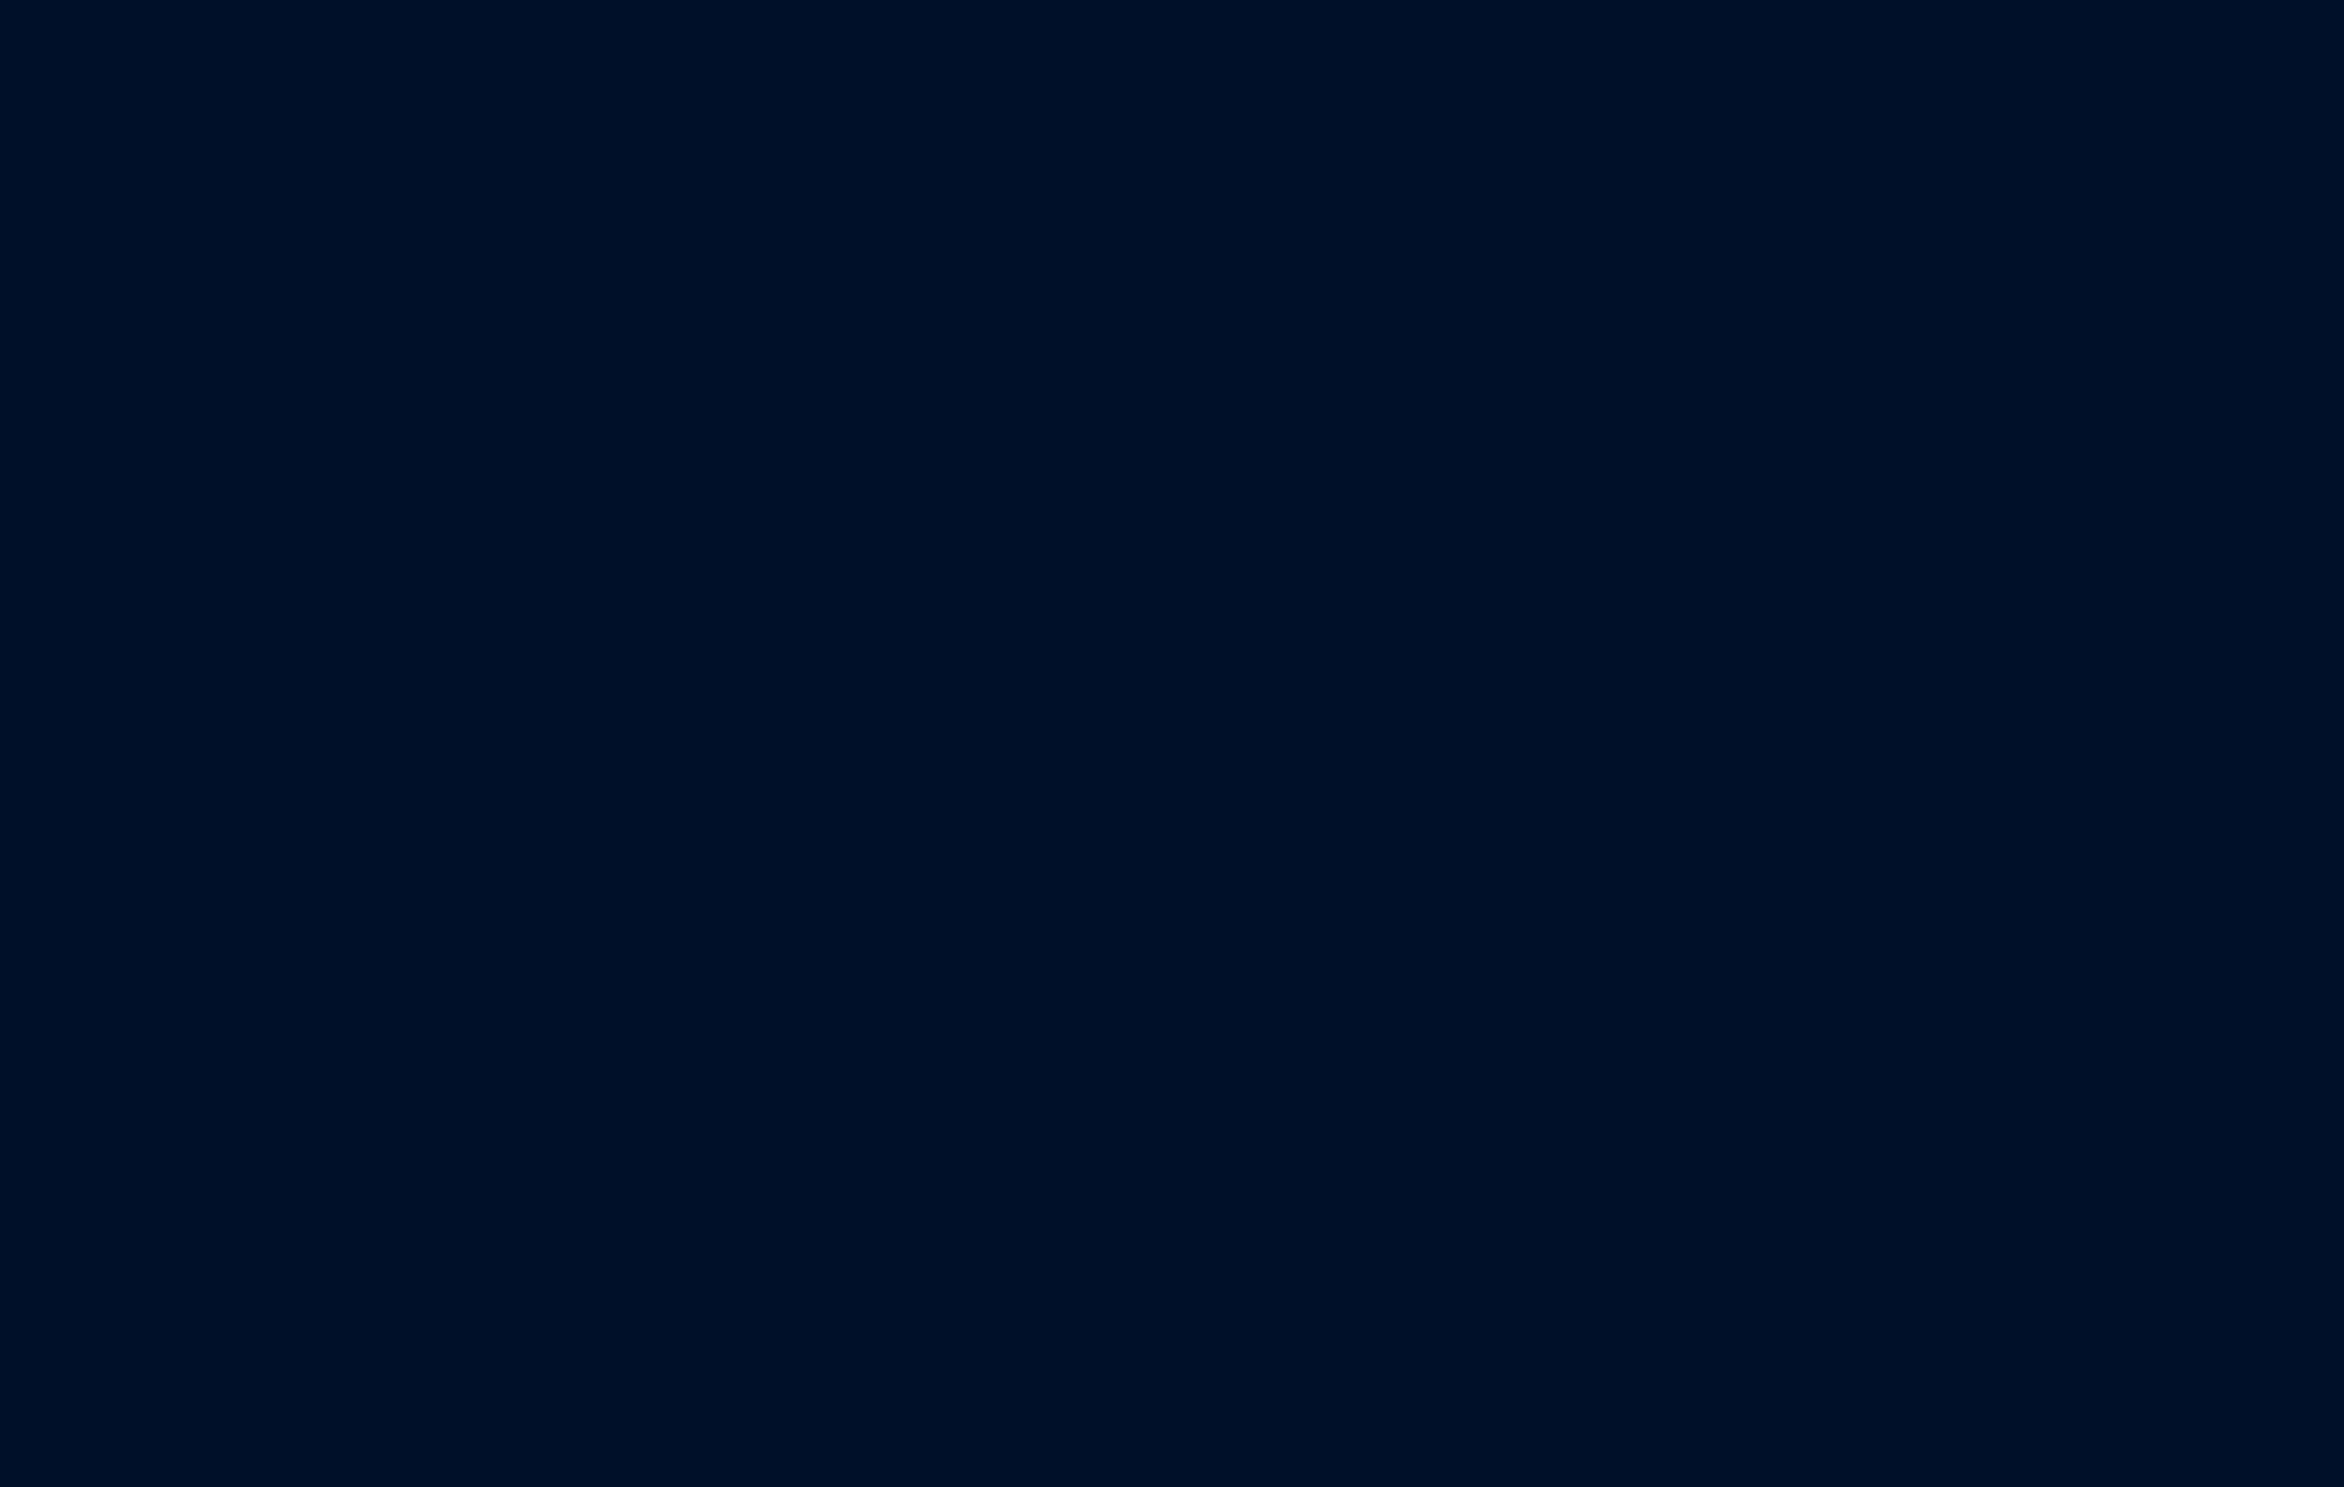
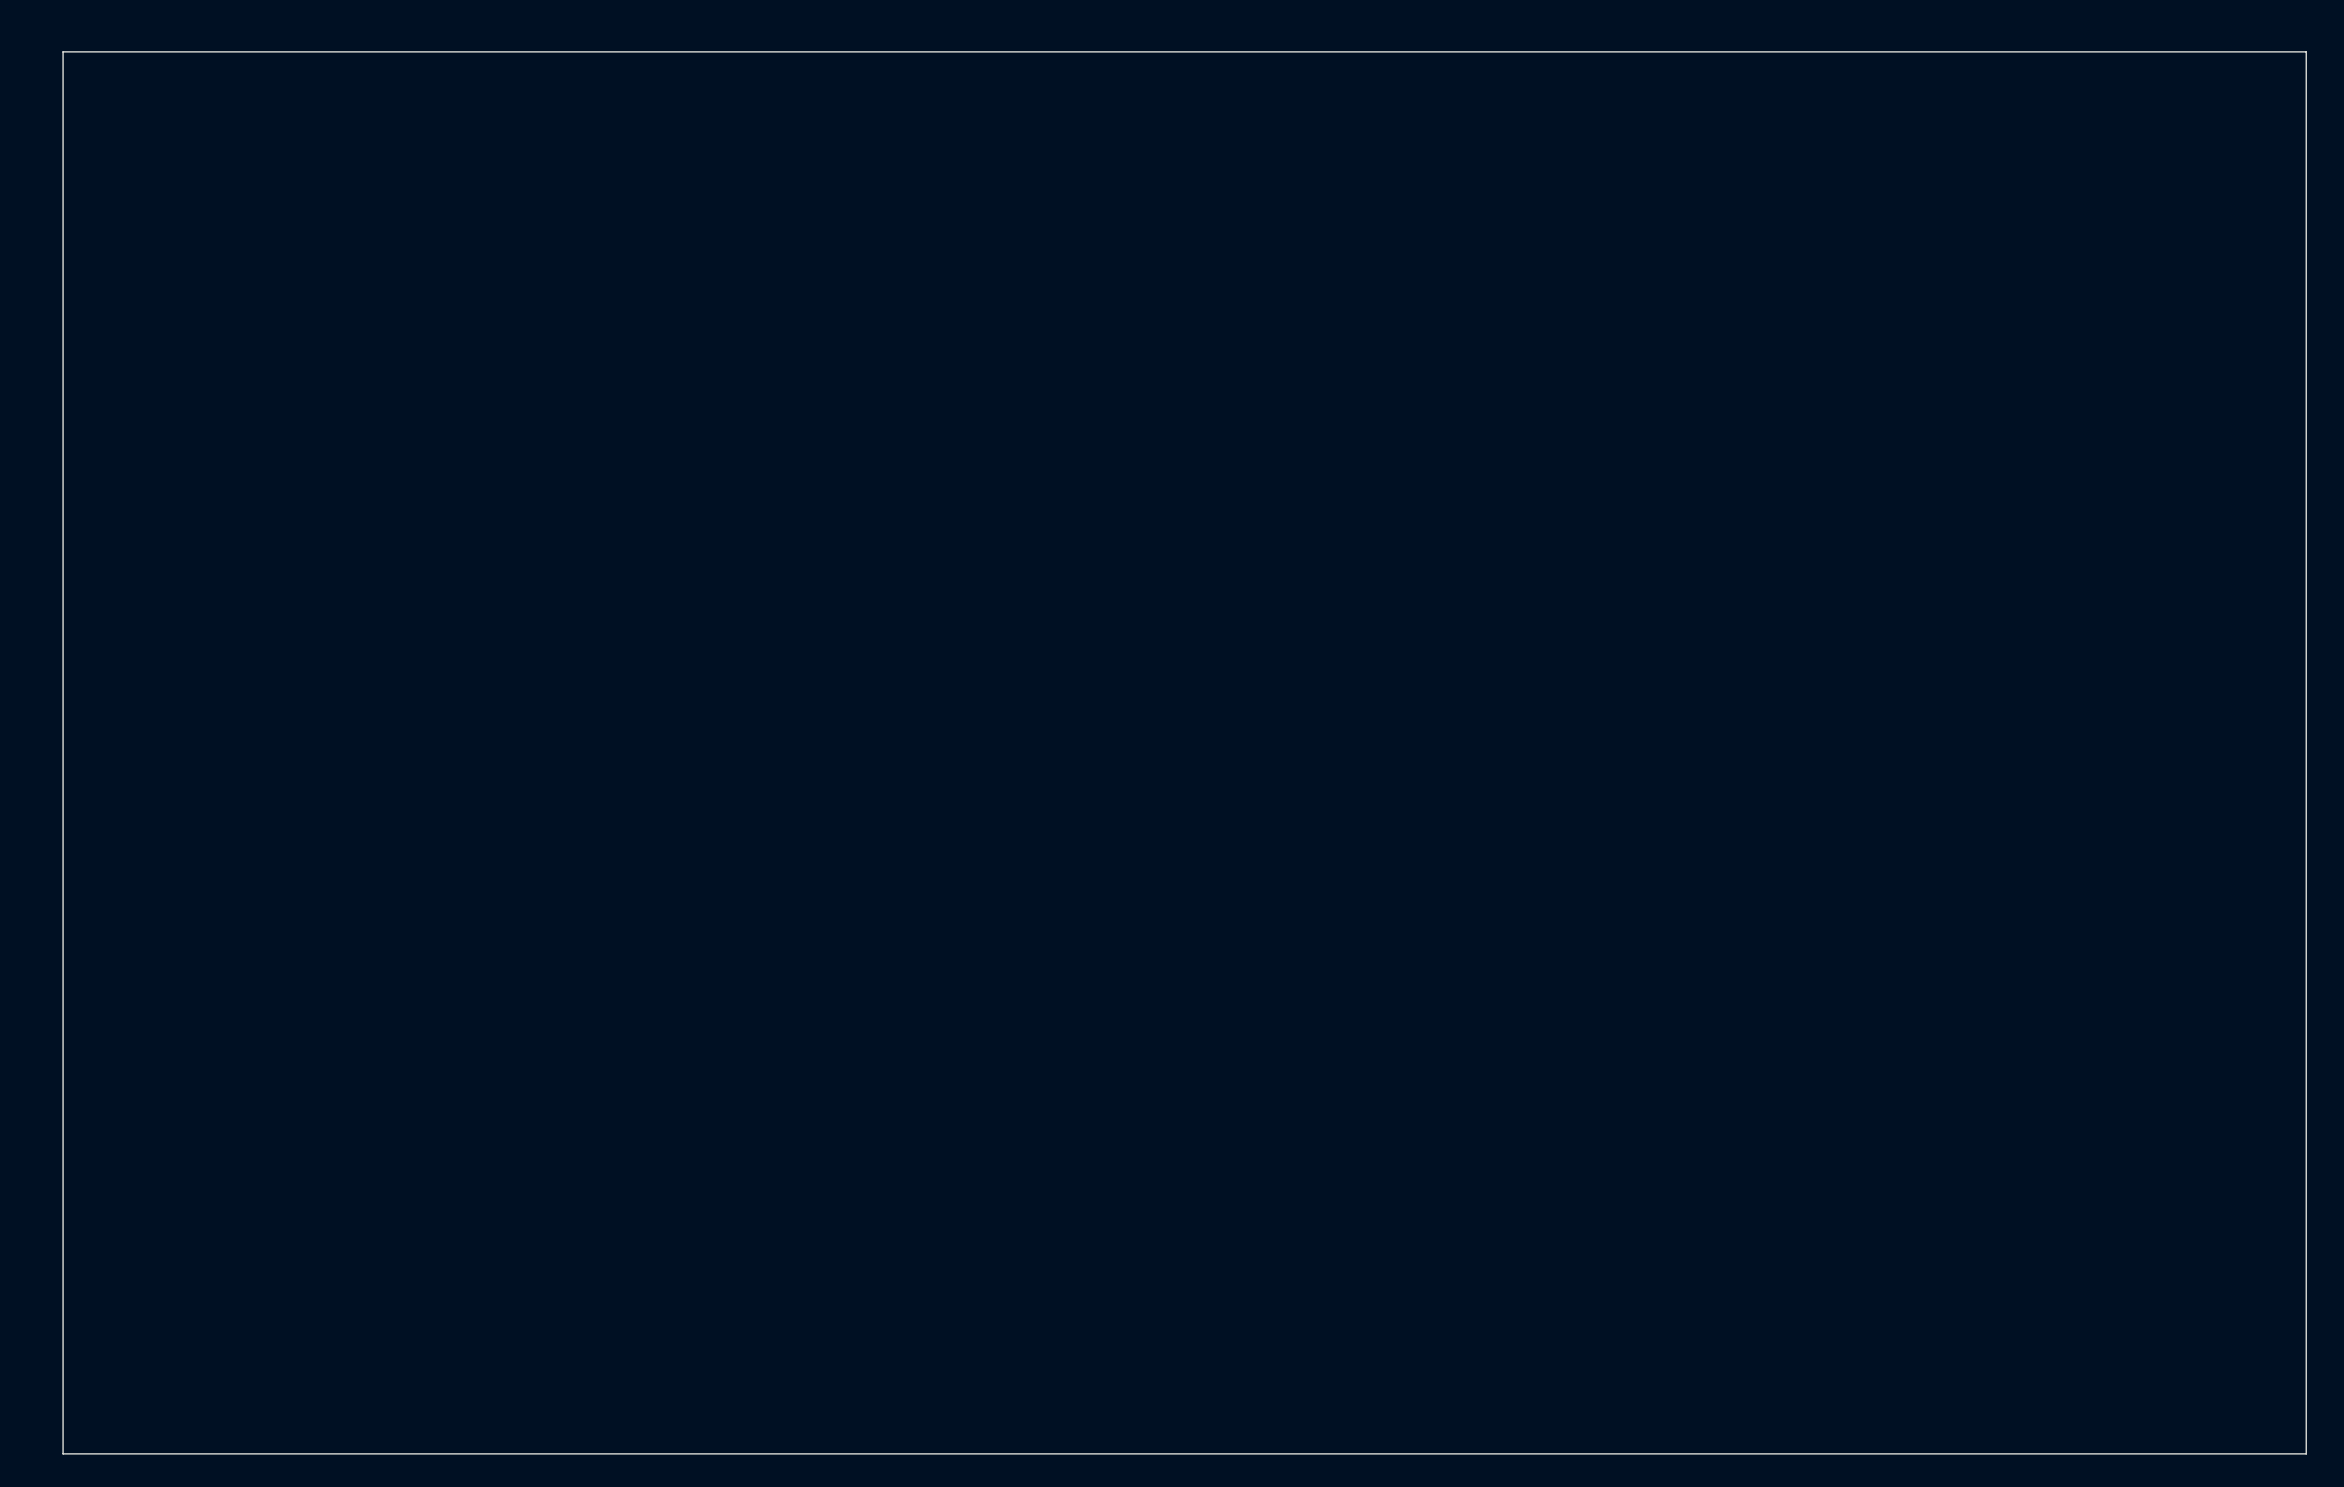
board edge: none -> (63, 51) (2306, 51) (2306, 1453) (63, 1453) (63, 51)

